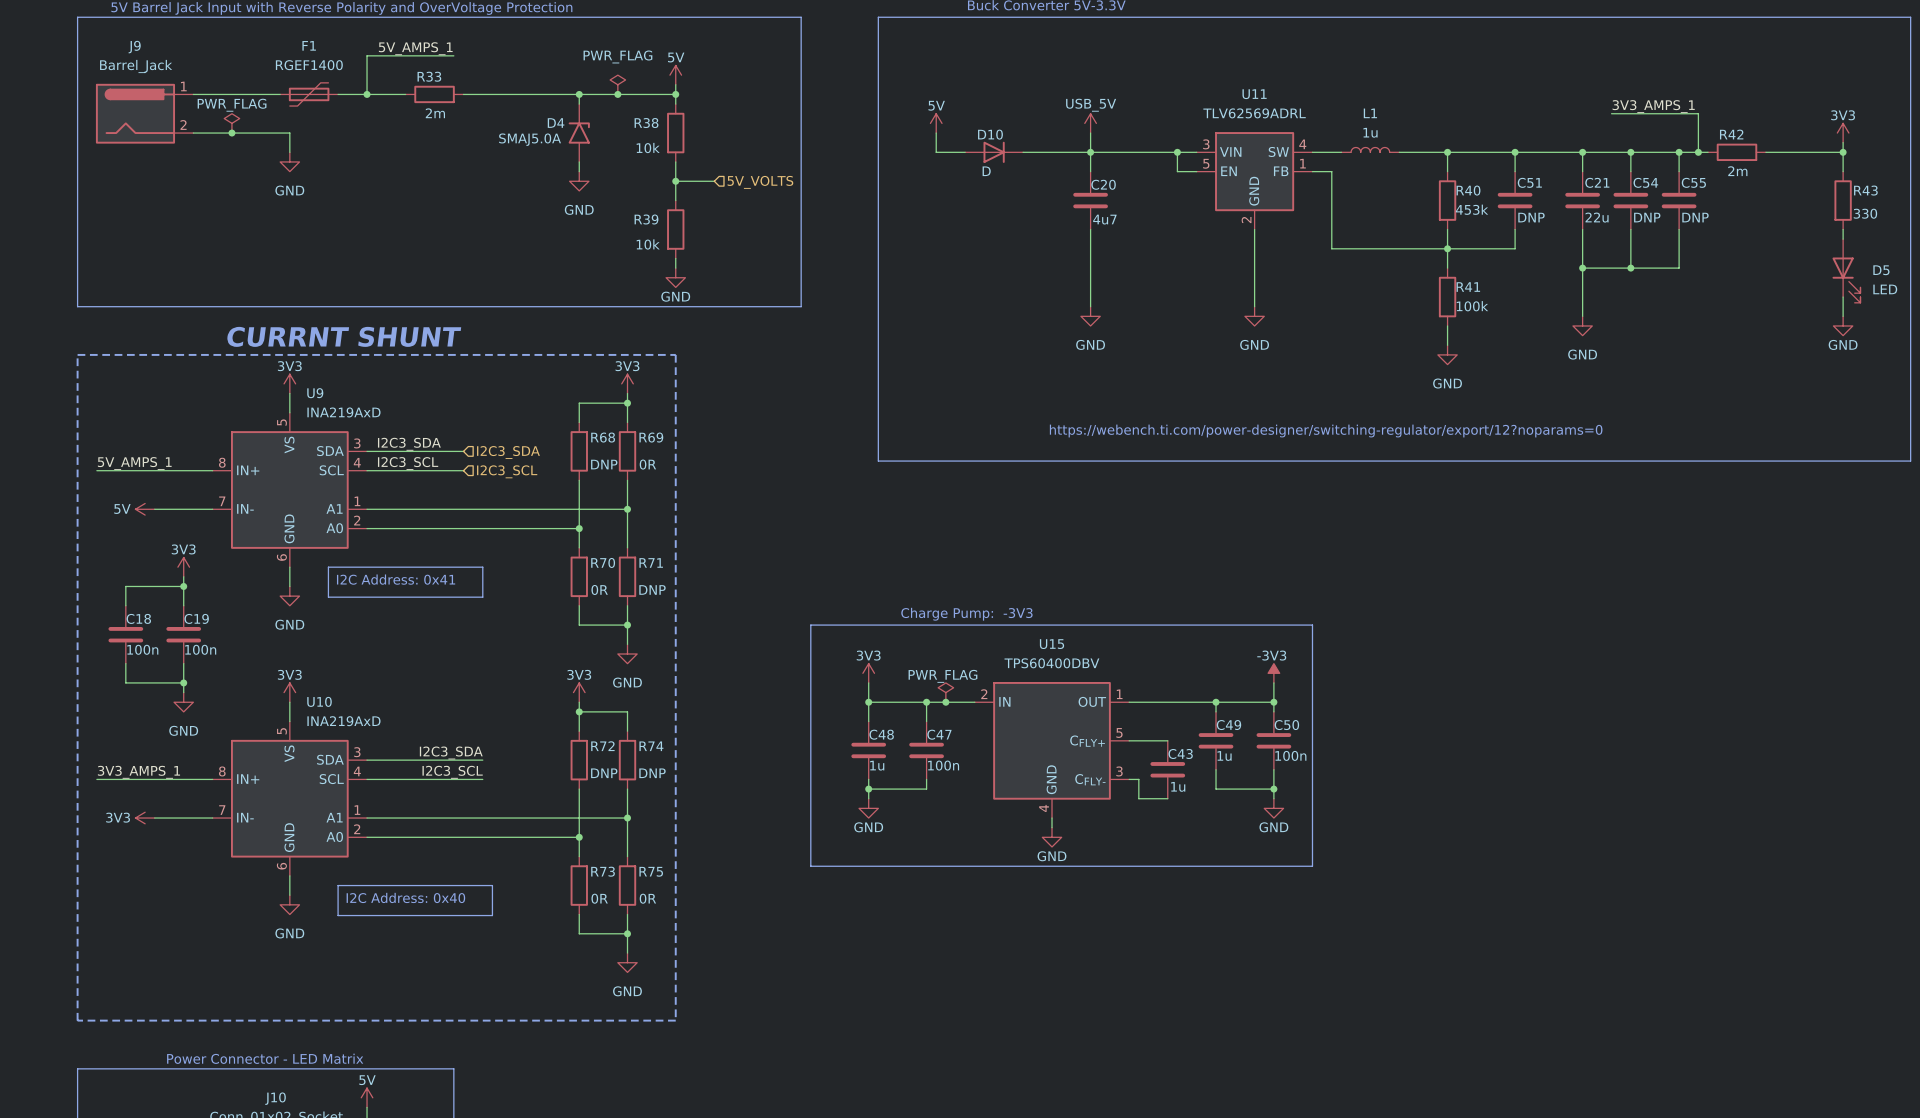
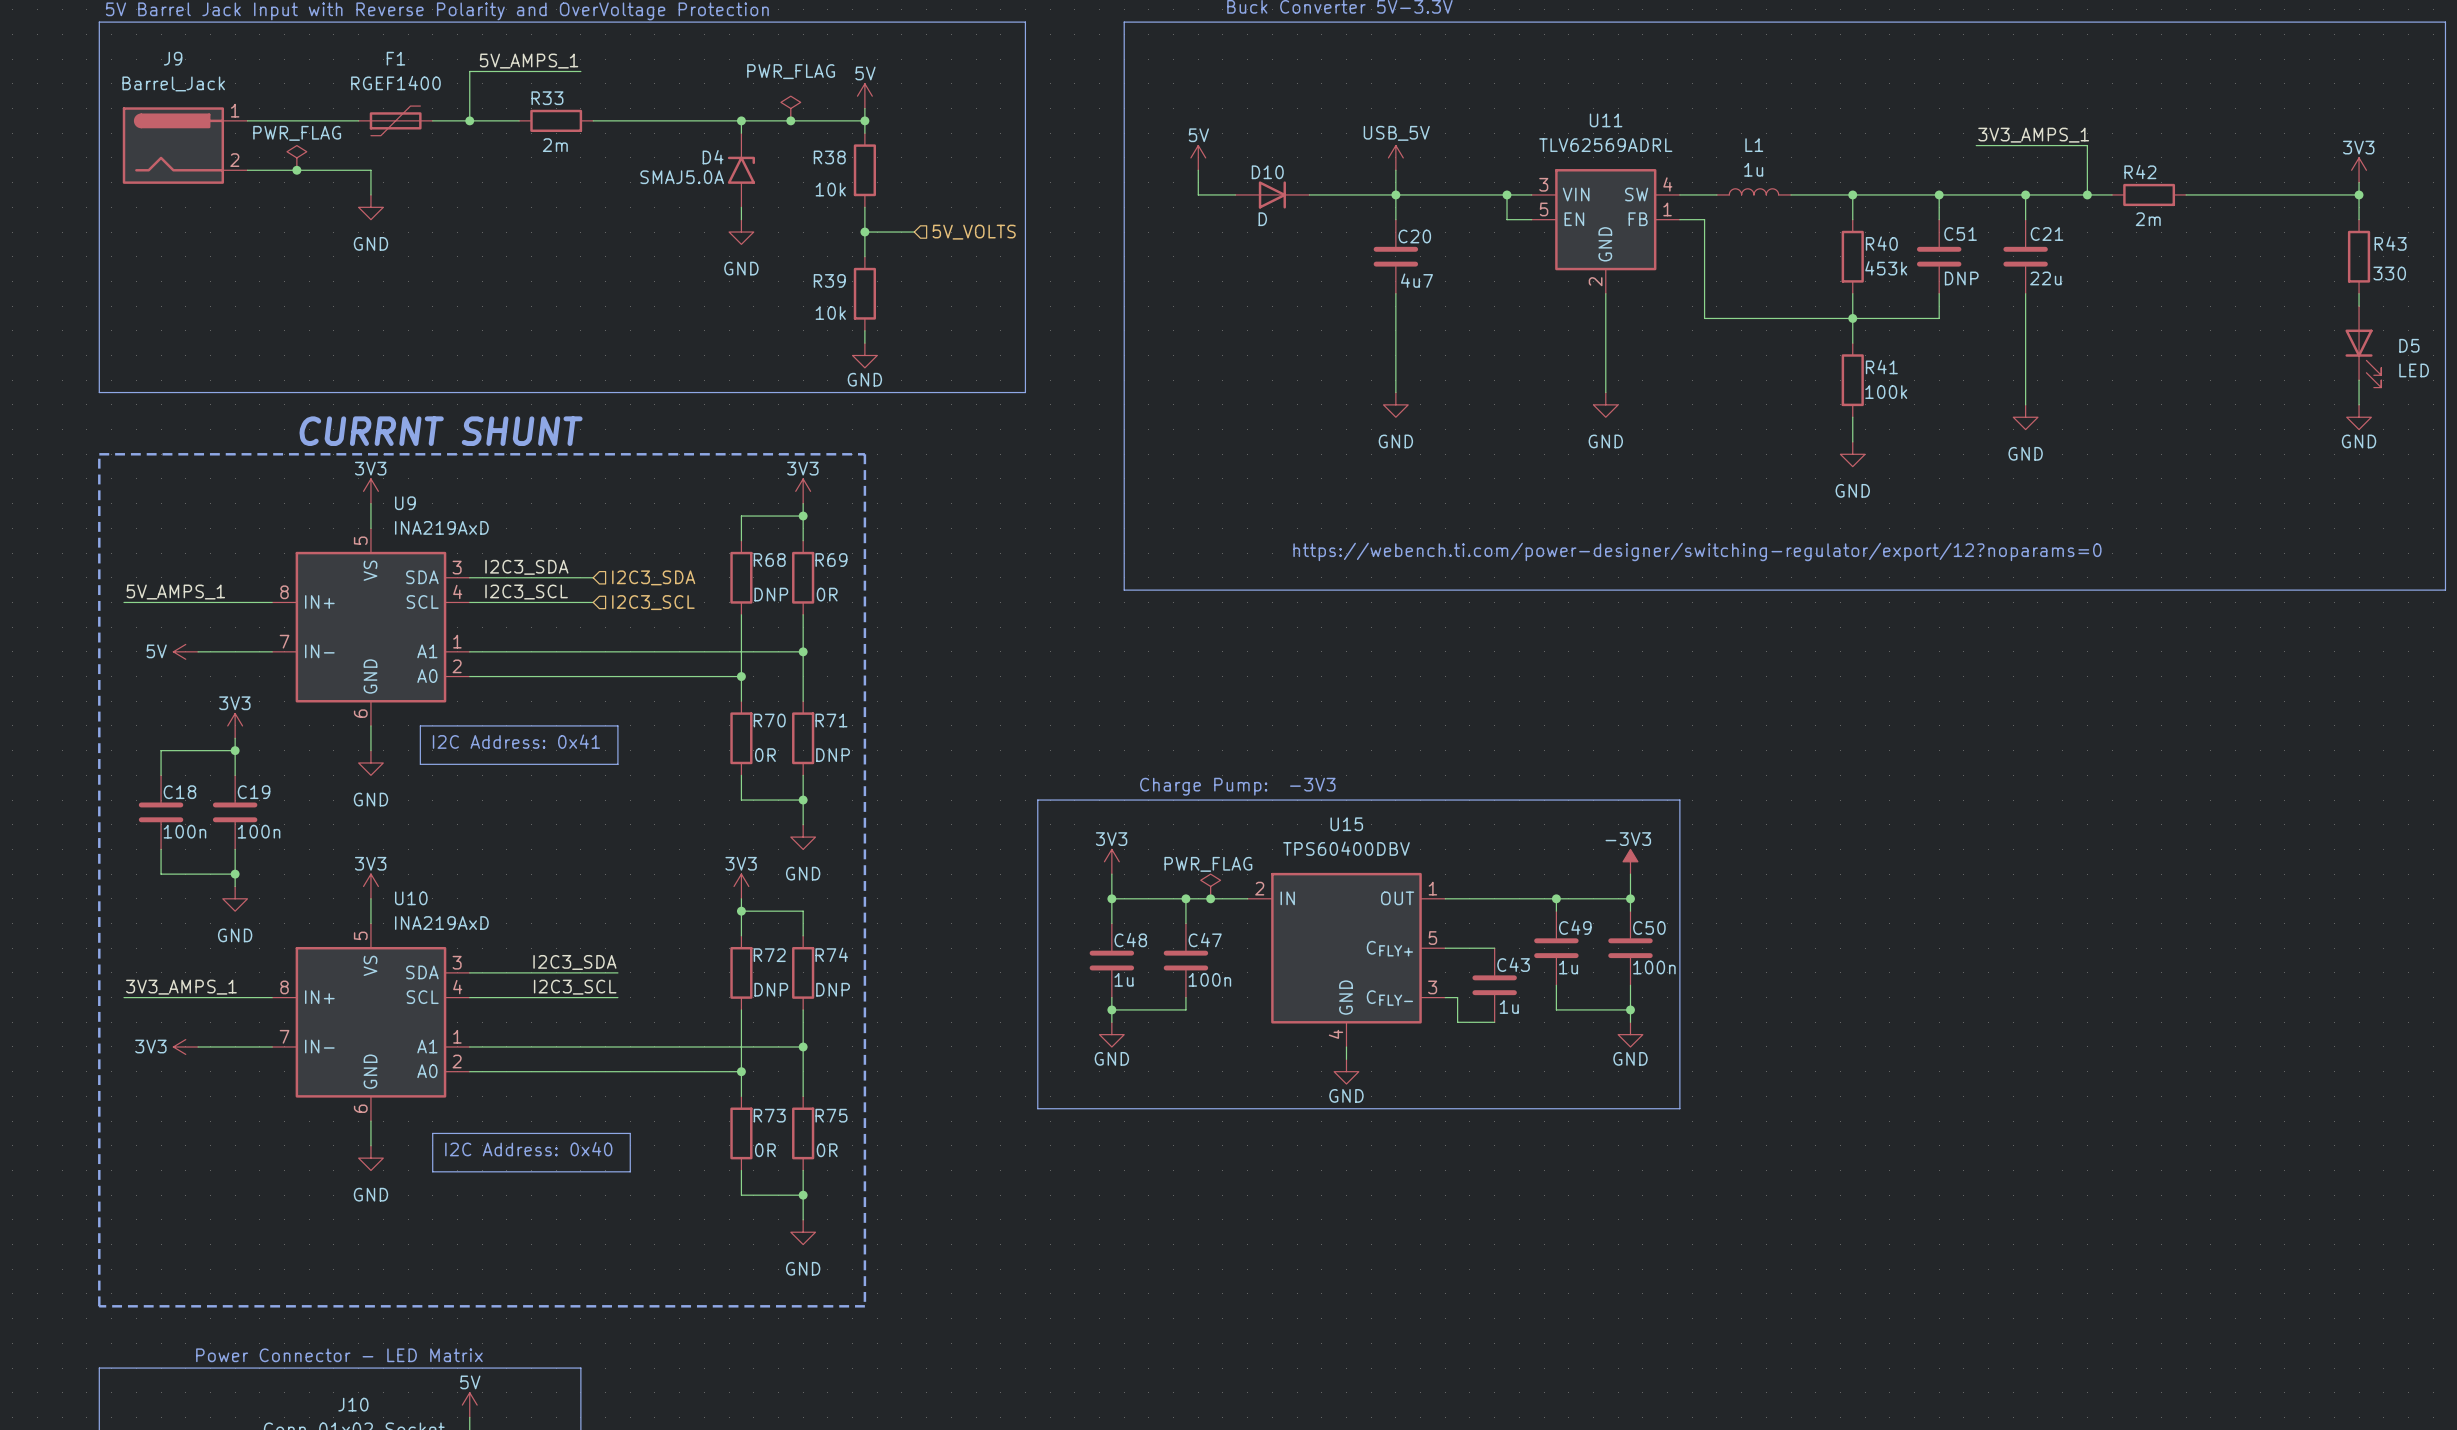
label position: 3V3_AMPS_1 (1653, 106) -> 3V3_AMPS_1 (2033, 135)
wire: none -> (1976, 145) (2062, 145)
wire: (1630, 113) (1698, 113) (1698, 152) -> none
wire: (1630, 152) (1630, 171) -> (2087, 194) (2087, 145)
wire: (1650, 152) (1708, 152) -> (2260, 194) (2186, 194)
wire: (1679, 152) (1679, 171) -> none
junction: (1679, 152) -> none
junction: (1698, 152) -> none
R42 position: (1736, 152) -> (2149, 194)
C54: DNP (1630, 200) -> none
C55: DNP (1679, 200) -> none
wire: (1630, 229) (1630, 268) -> none
wire: (1679, 229) (1679, 268) (1582, 268) -> none
junction: (1582, 268) -> none
junction: (1630, 268) -> none

